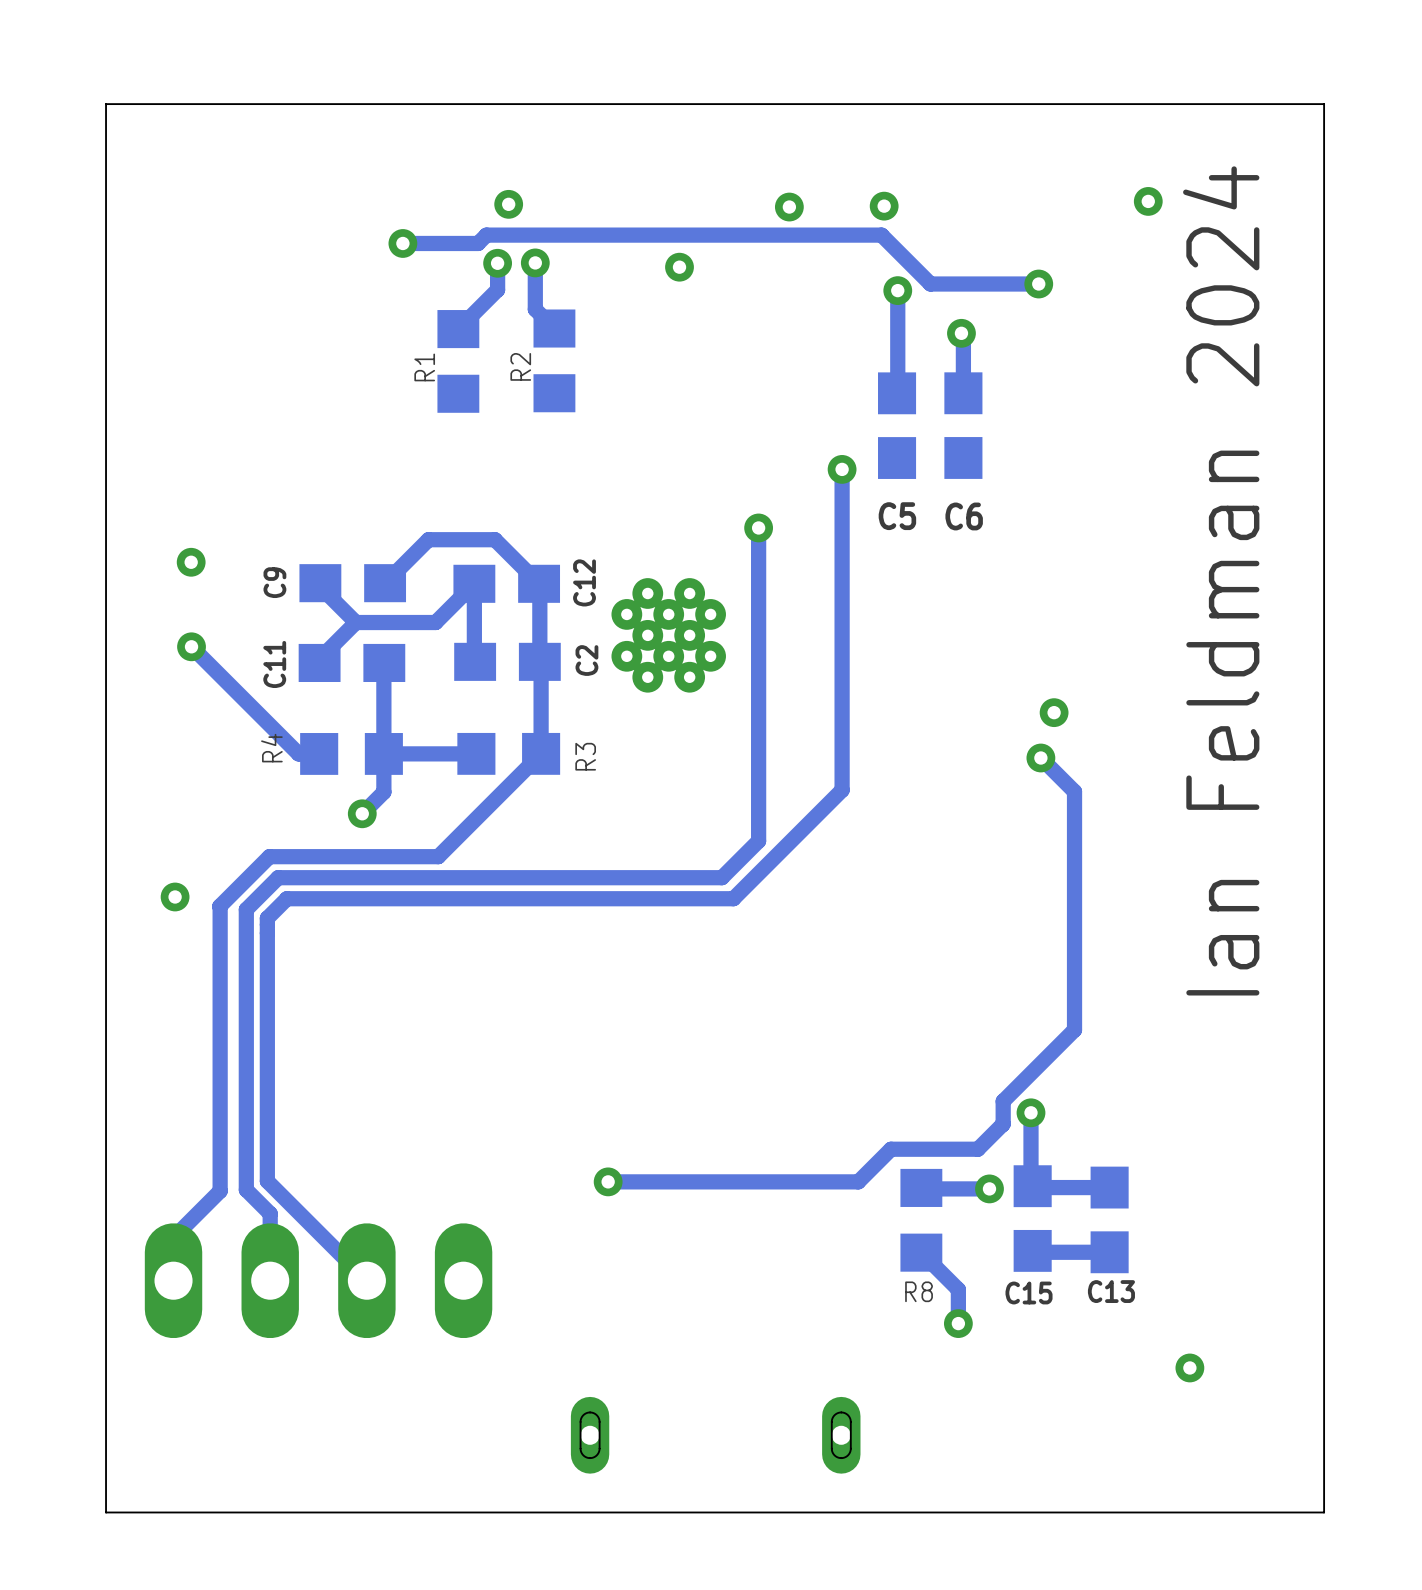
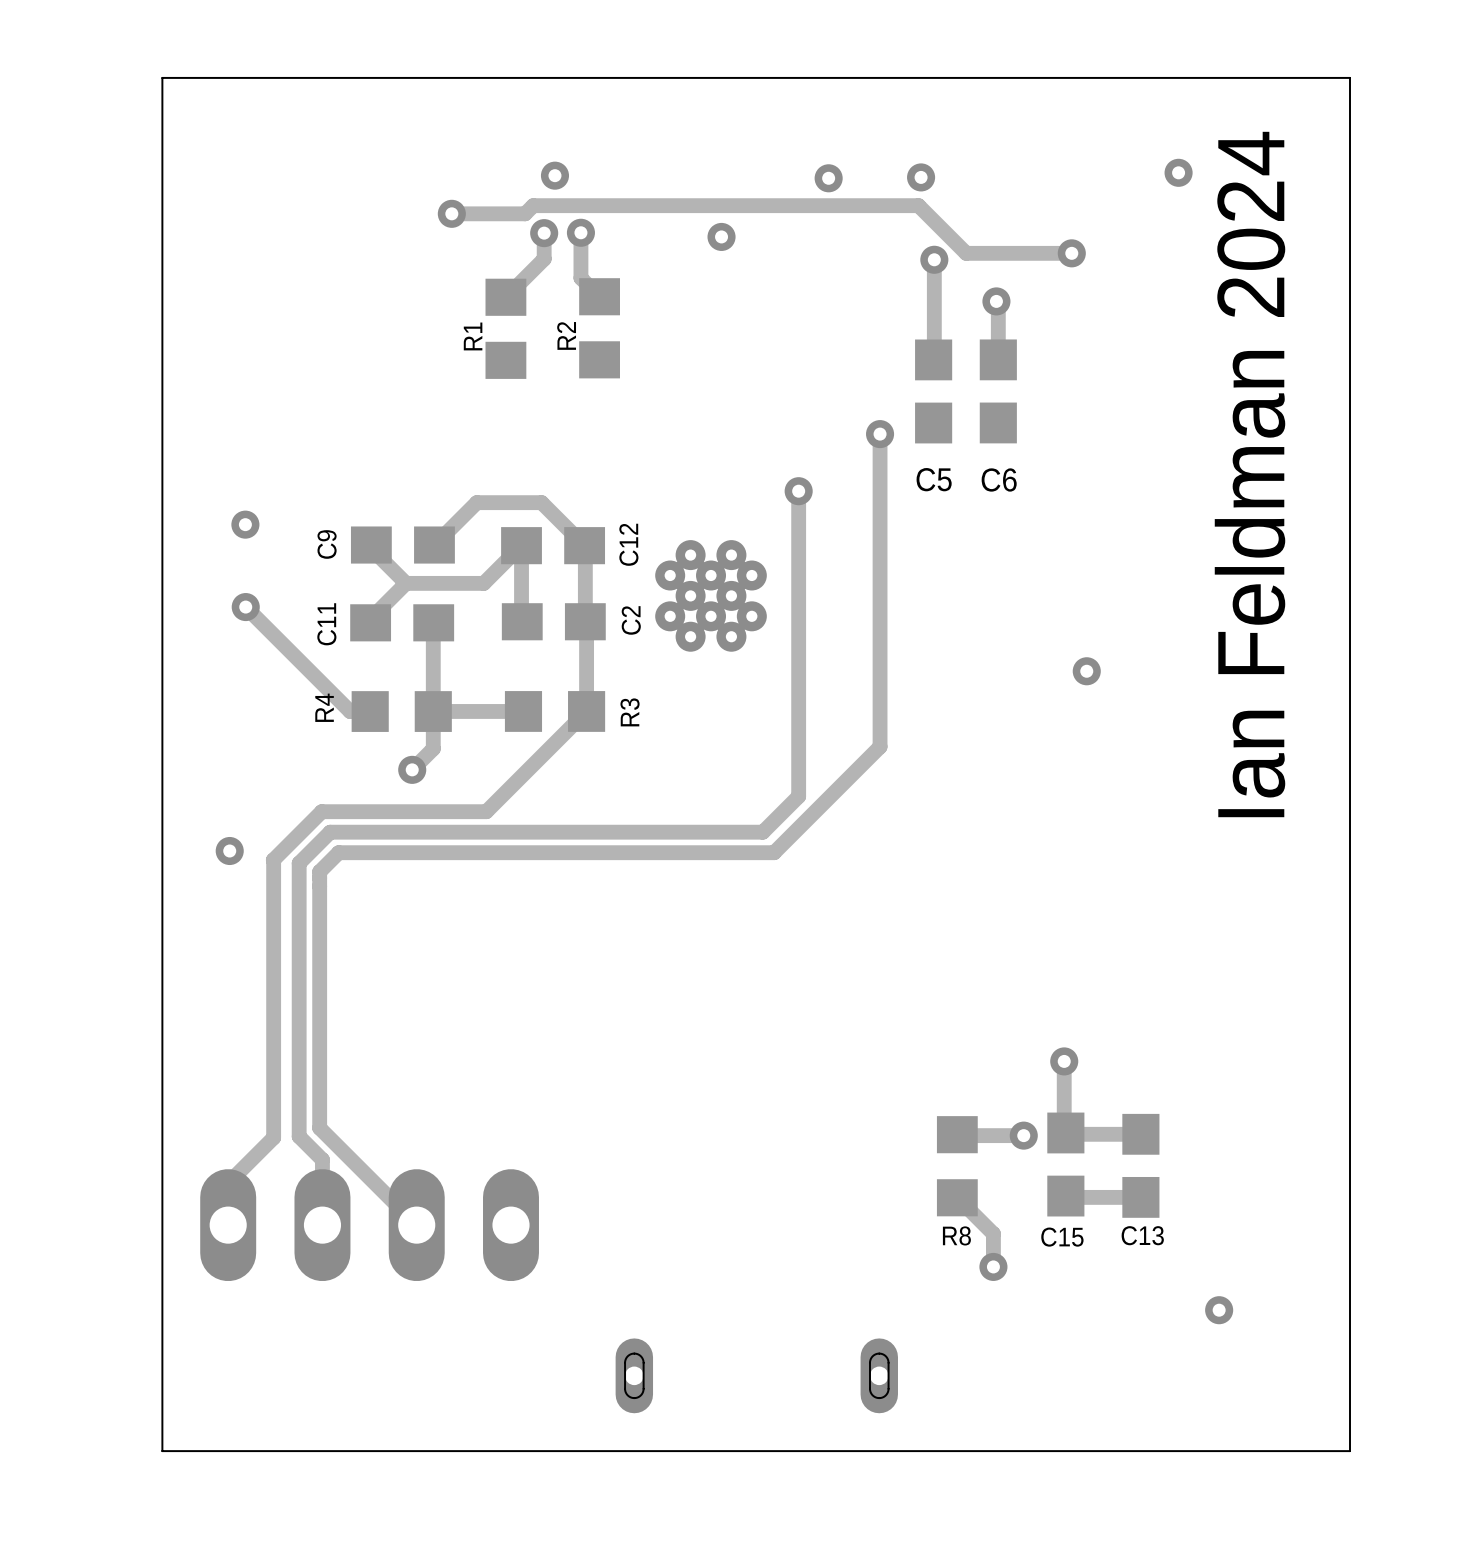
track: (1040, 758) (1074, 791) (1074, 1029) (1003, 1101) (1003, 1123) (977, 1149) (890, 1149) (858, 1181) (608, 1181) -> none
via: (1040, 758) -> none
via: (608, 1181) -> none

